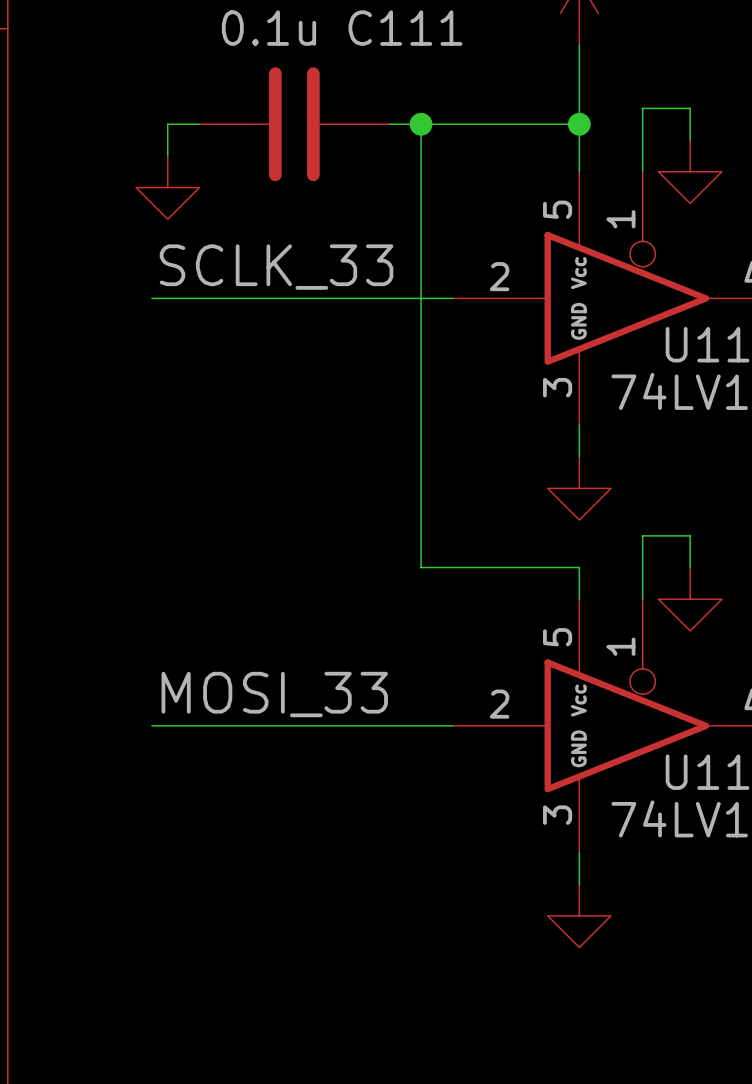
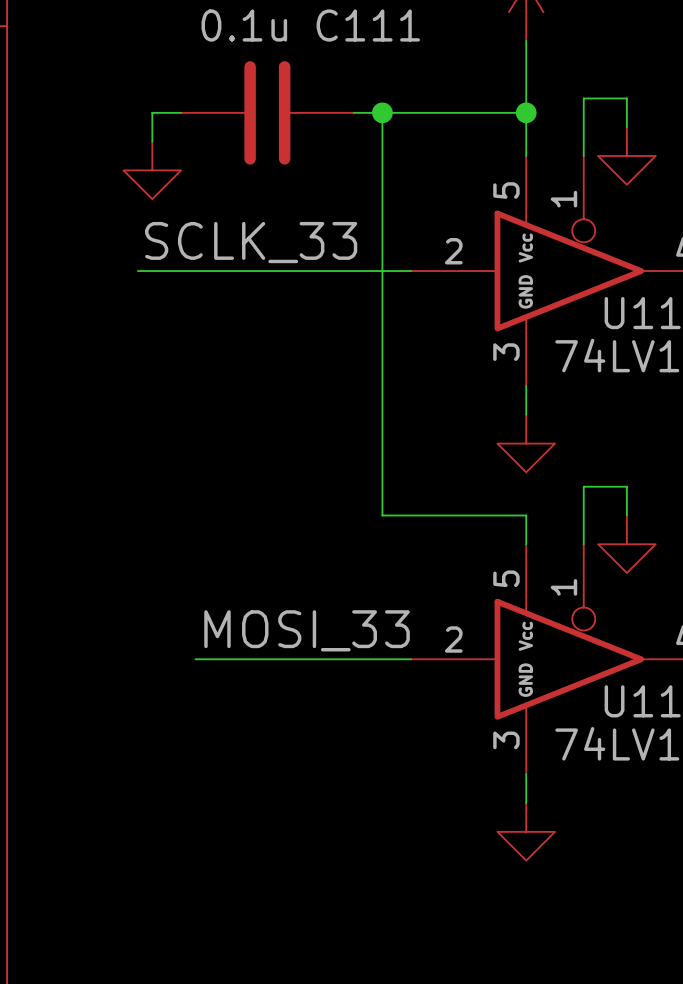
label position: MOSI_33 (274, 694) -> MOSI_33 (307, 630)
wire: (151, 725) (215, 725) -> none

